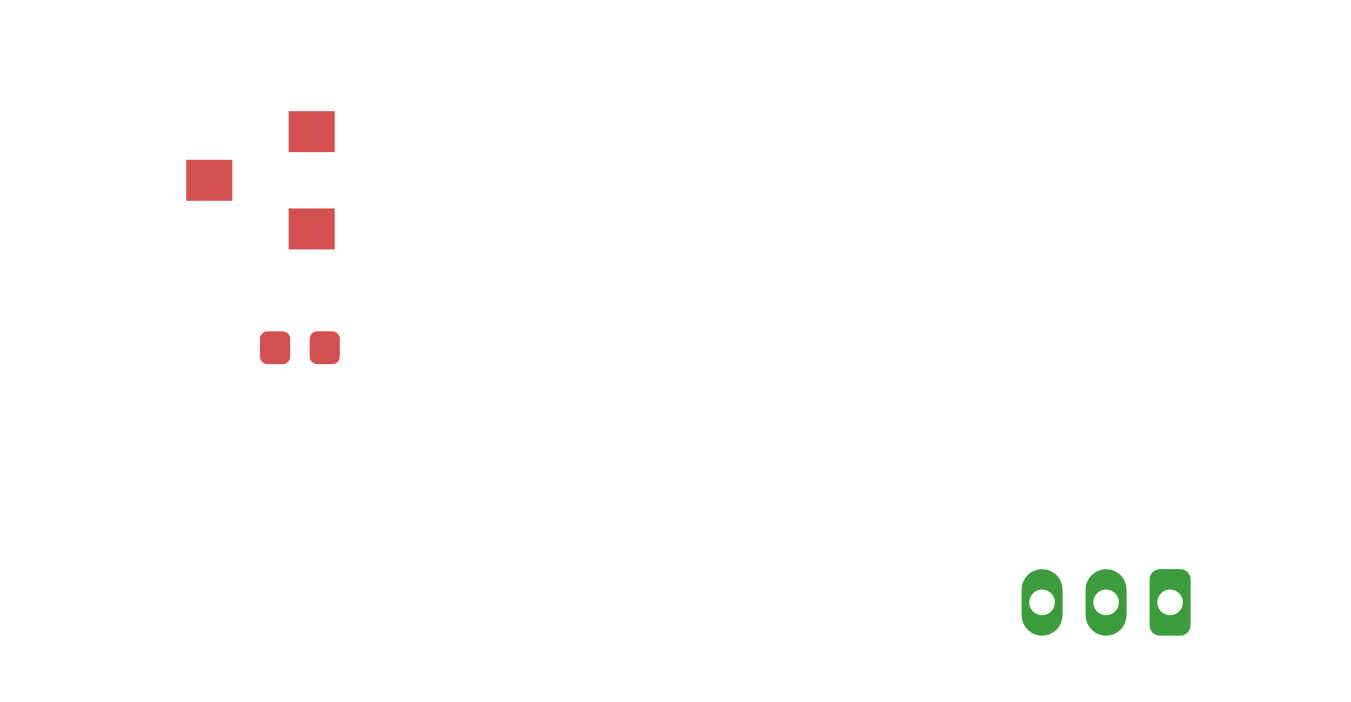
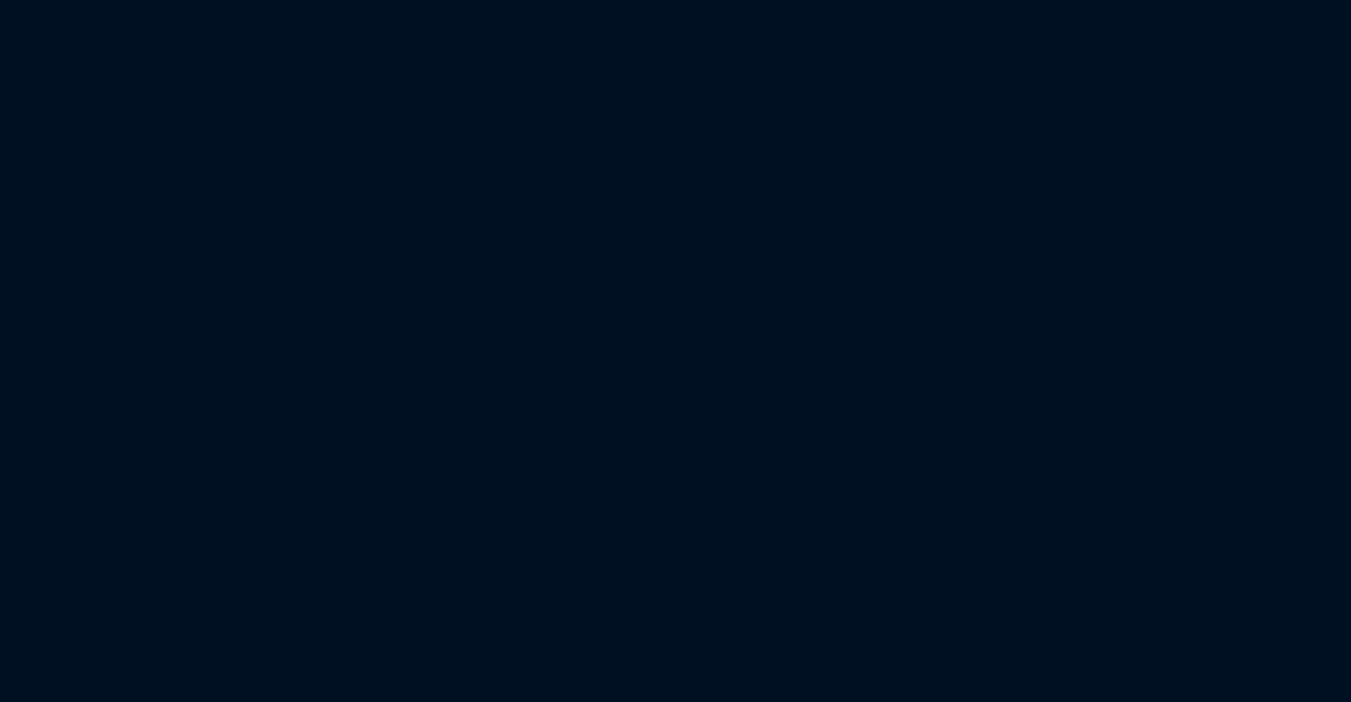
part: (260, 180) -> none
part: (299, 347) -> none
part: (1106, 602) -> none

